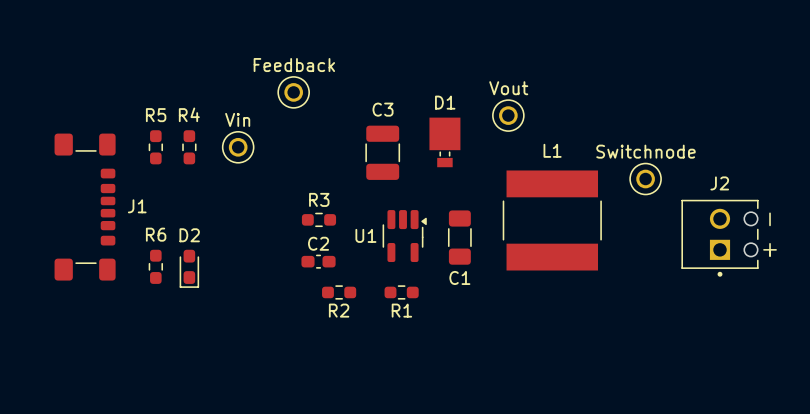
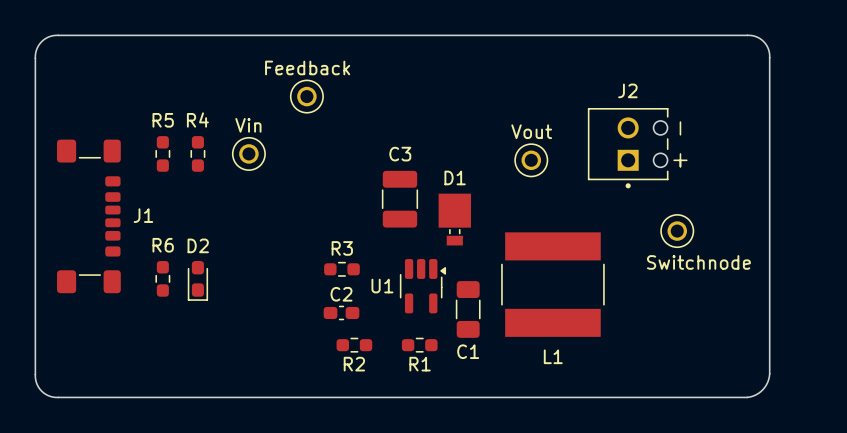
board edge: none -> (58, 35) (749, 35) (757, 37) (765, 43) (769, 55) (769, 373) (767, 382) (758, 393) (747, 397) (55, 397) (48, 395) (39, 389) (35, 377) (35, 55) (37, 48) (43, 39) (58, 35)
Vout position: (508, 115) -> (531, 160)
D1 position: (444, 142) -> (454, 219)
L1 name position: L1 (552, 150) -> L1 (553, 356)
Switchnode name position: Switchnode (645, 151) -> Switchnode (698, 262)
C3 position: (382, 152) -> (399, 199)
Switchnode position: (645, 179) -> (677, 231)
J2 footprint: [681, 199, 777, 277] -> [587, 108, 688, 189]
R3 position: (318, 219) -> (341, 269)
L1 position: (552, 220) -> (552, 284)
U1 position: (404, 236) -> (422, 286)
C1 position: (459, 237) -> (468, 309)
C2 position: (318, 261) -> (341, 312)
R2 position: (339, 292) -> (354, 345)
R1 position: (401, 292) -> (419, 345)

